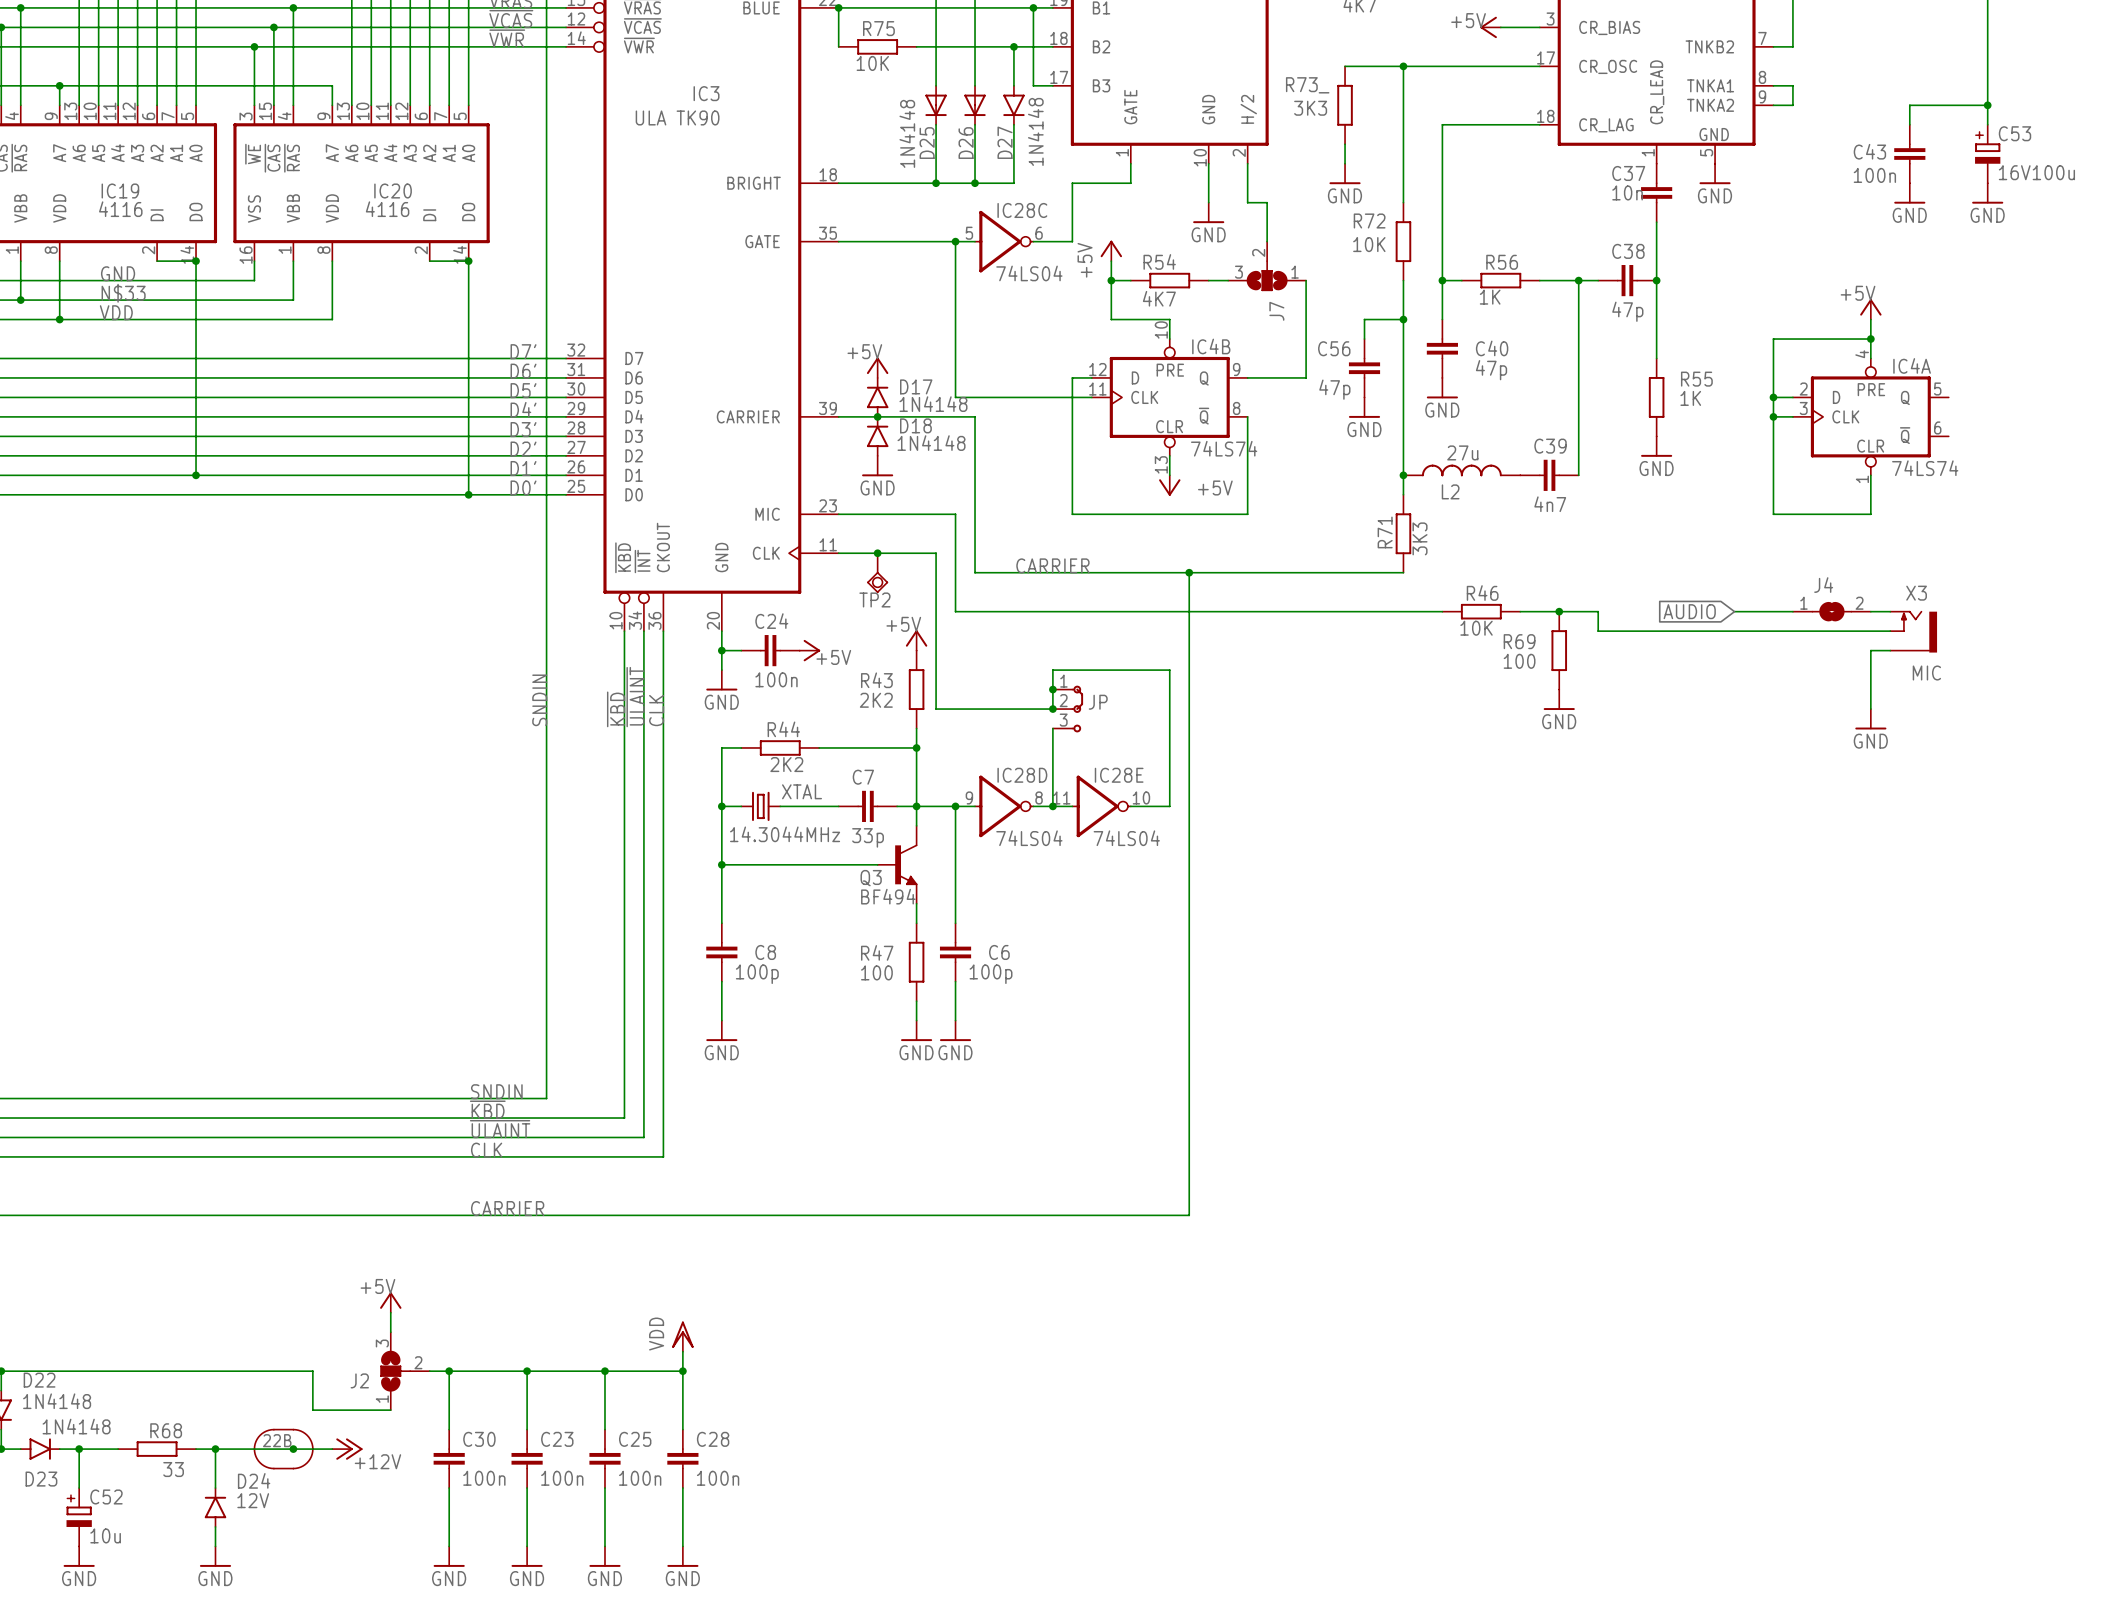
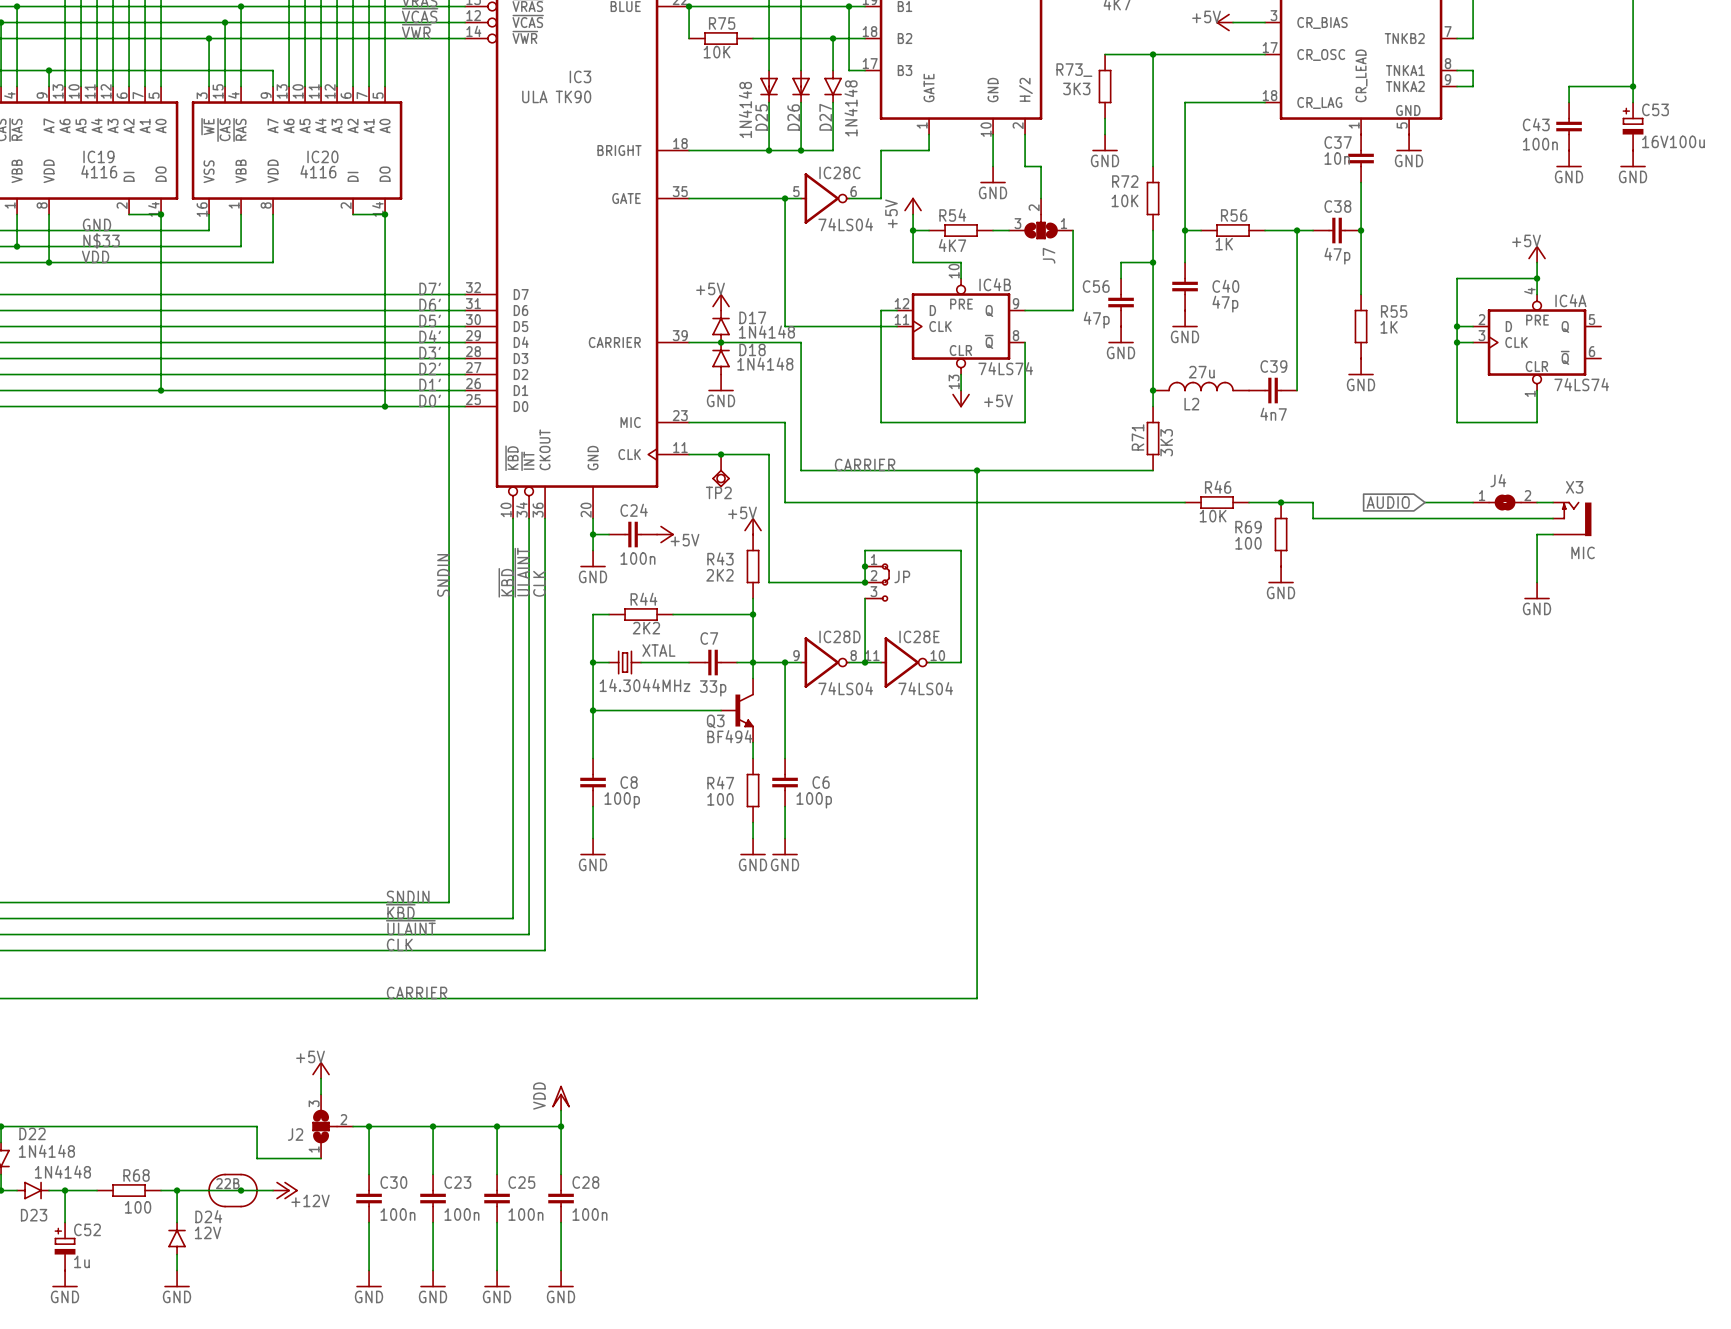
R68 value: 33 (173, 1469) -> 100 (138, 1207)
C52 value: 10u (105, 1535) -> 1u (81, 1261)

